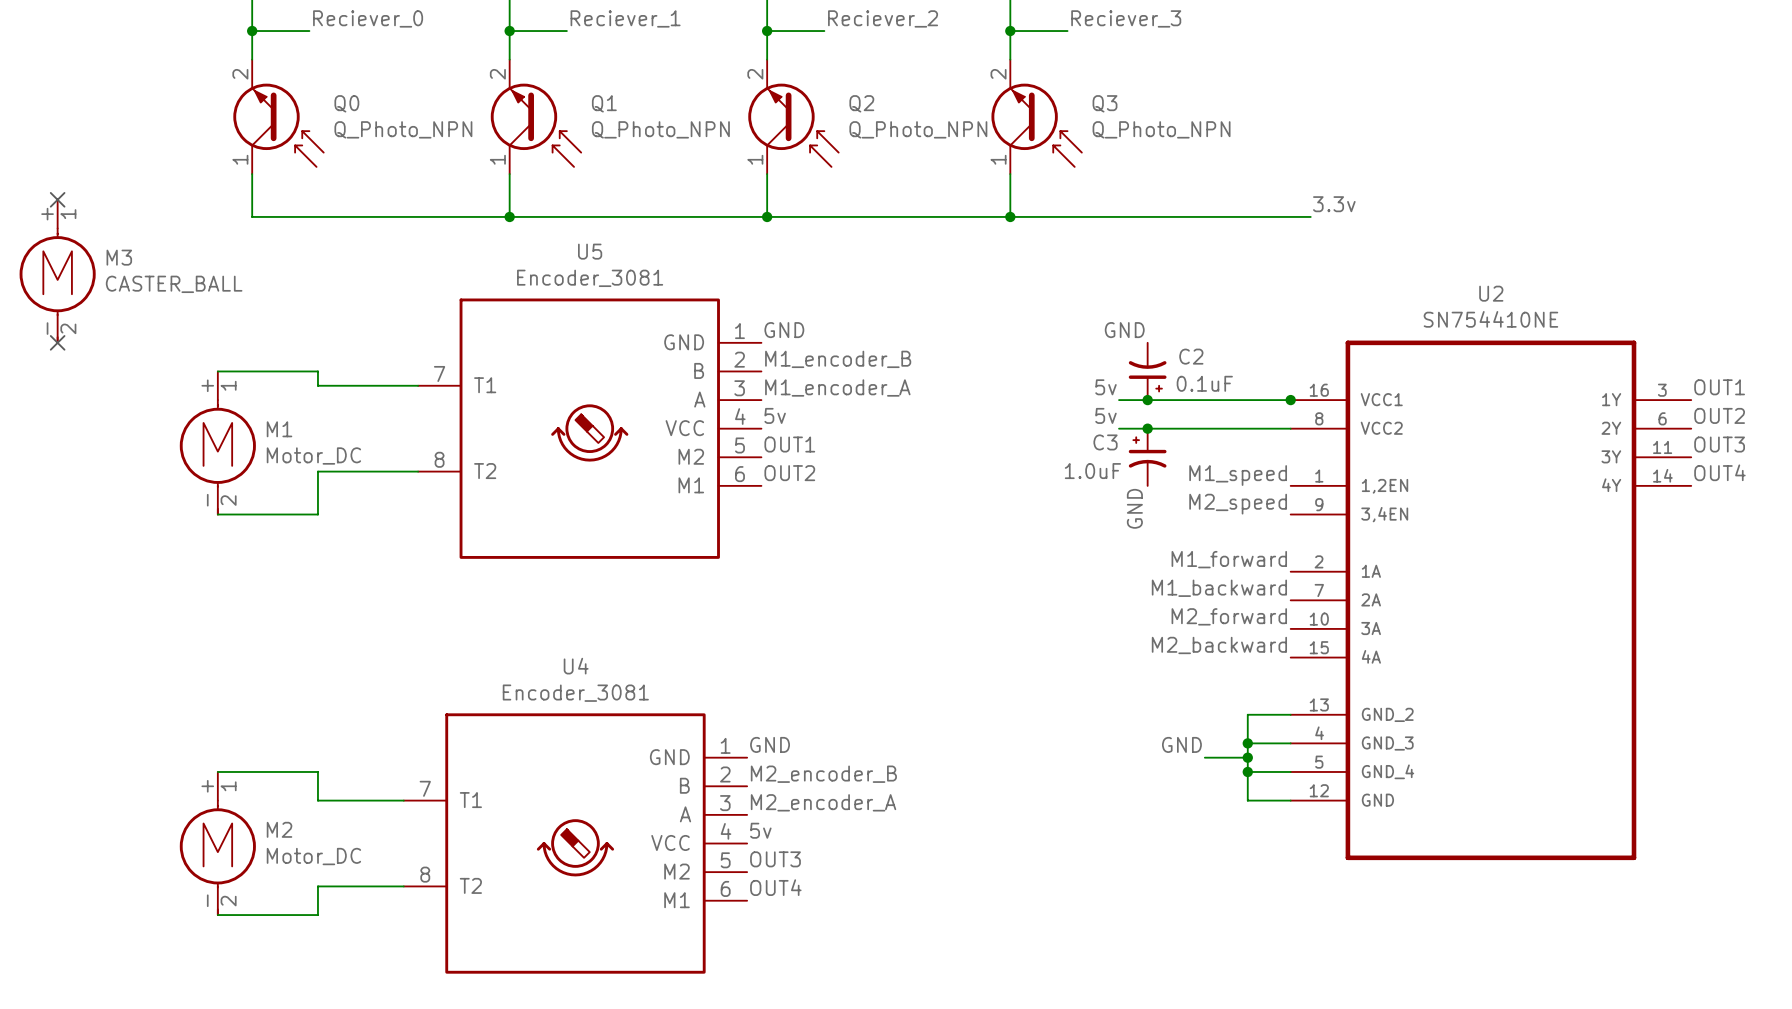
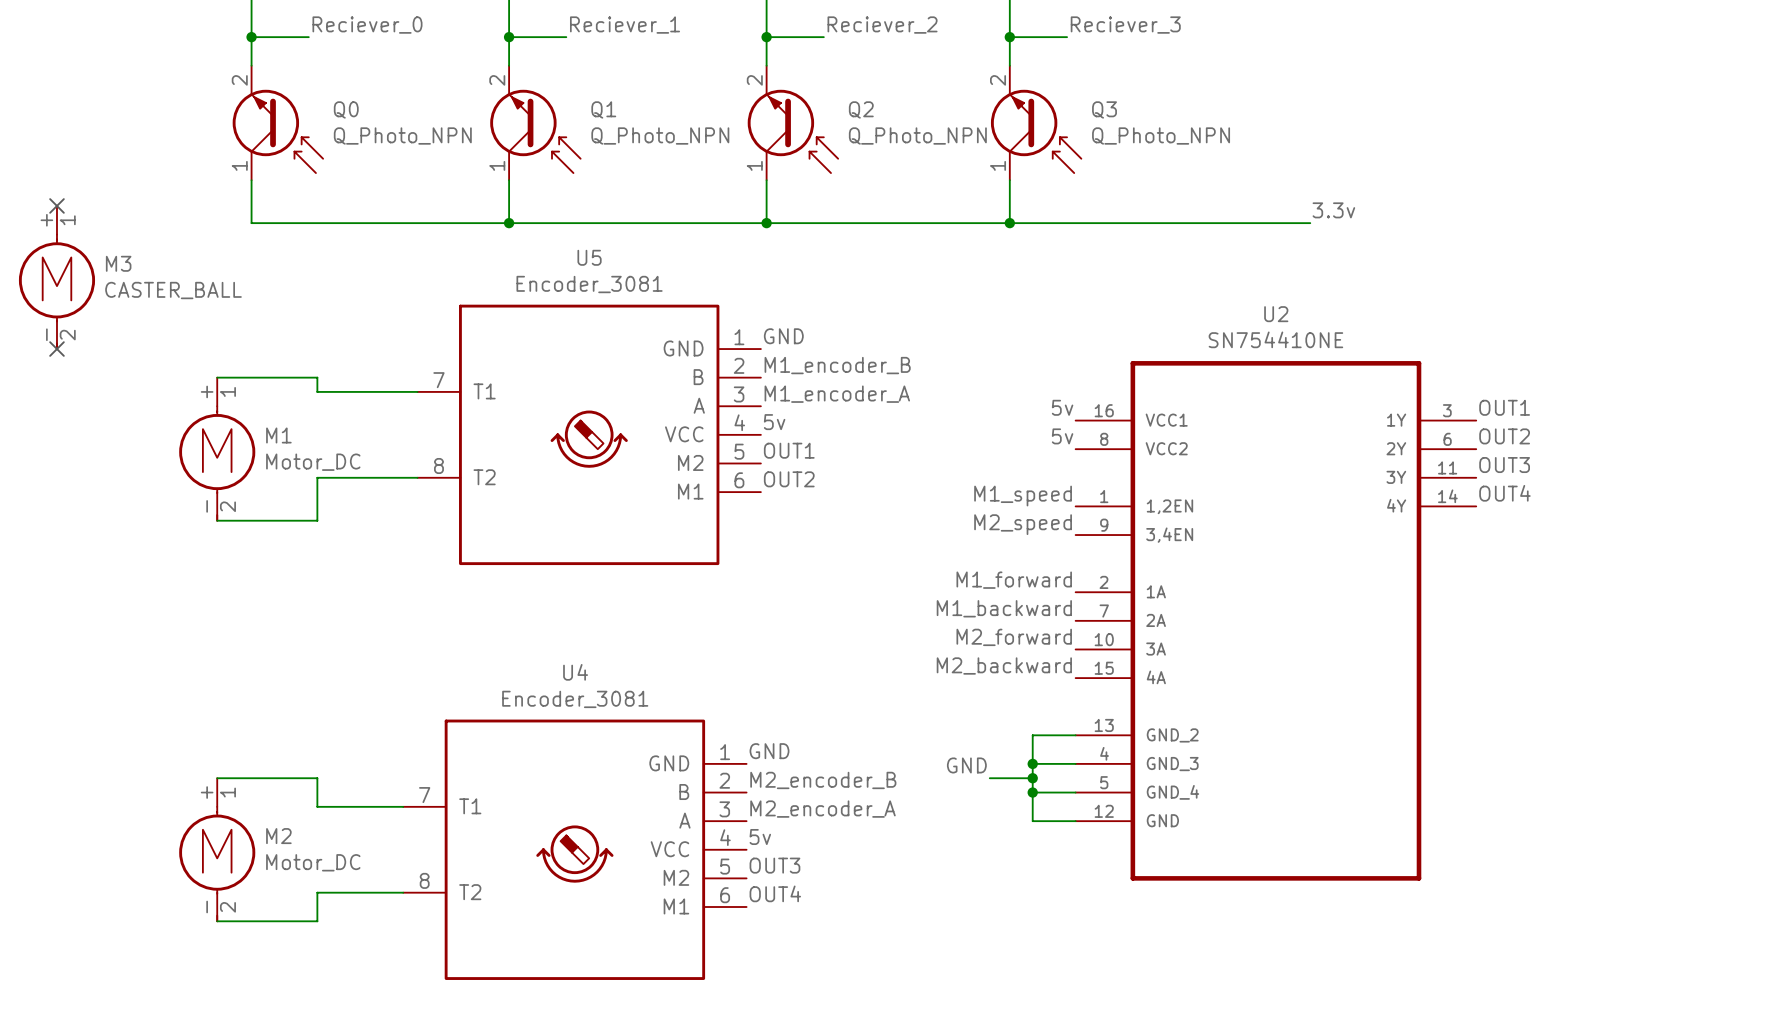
label: GND (1124, 330) -> none
C2: 0.1uF (1147, 371) -> none
label: 5v (1105, 387) -> none
label position: OUT1 (1719, 387) -> OUT1 (1504, 407)
wire: (1119, 400) (1290, 400) -> none
junction: (1147, 400) -> none
junction: (1290, 400) -> none
label: none -> 5v (1062, 407)
label: 5v (1105, 415) -> none
label position: OUT2 (1719, 415) -> OUT2 (1504, 436)
wire: (1119, 428) (1290, 428) -> none
junction: (1147, 428) -> none
label: none -> 5v (1062, 436)
label position: OUT3 (1719, 444) -> OUT3 (1504, 465)
C3: 1.0uF (1147, 457) -> none
label position: OUT4 (1719, 472) -> OUT4 (1504, 493)
label position: M1_speed (1238, 475) -> M1_speed (1023, 496)
label position: M2_speed (1238, 504) -> M2_speed (1023, 524)
label: GND (1134, 508) -> none
label position: M1_forward (1229, 559) -> M1_forward (1014, 580)
label position: M1_backward (1219, 588) -> M1_backward (1004, 608)
U2 position: (1490, 600) -> (1275, 620)
label position: M2_forward (1229, 616) -> M2_forward (1014, 637)
label position: M2_backward (1219, 645) -> M2_backward (1004, 666)
wire: (1290, 714) (1247, 714) (1247, 800) (1290, 800) -> (1075, 735) (1032, 735) (1032, 821) (1075, 821)
wire: (1247, 743) (1290, 743) -> (1032, 763) (1075, 763)
junction: (1247, 743) -> none
label: GND (1181, 744) -> none
junction: none -> (1032, 763)
wire: (1204, 757) (1247, 757) -> (989, 778) (1032, 778)
junction: (1247, 757) -> none
label: none -> GND (966, 765)
junction: none -> (1032, 778)
wire: (1247, 771) (1290, 771) -> (1032, 792) (1075, 792)
junction: (1247, 771) -> none
junction: none -> (1032, 792)

